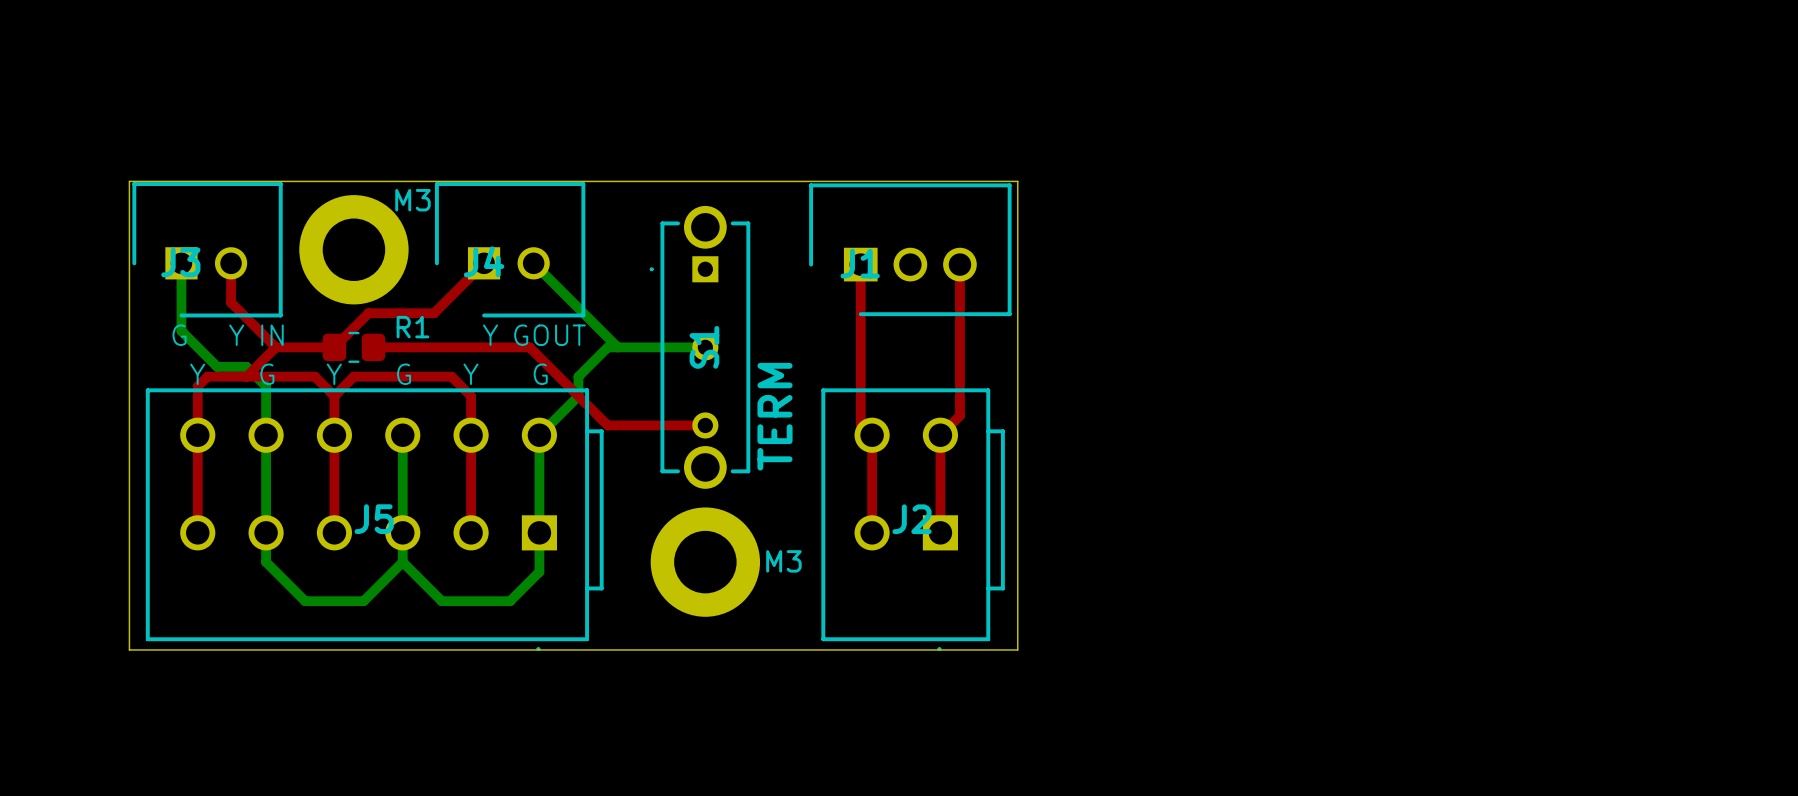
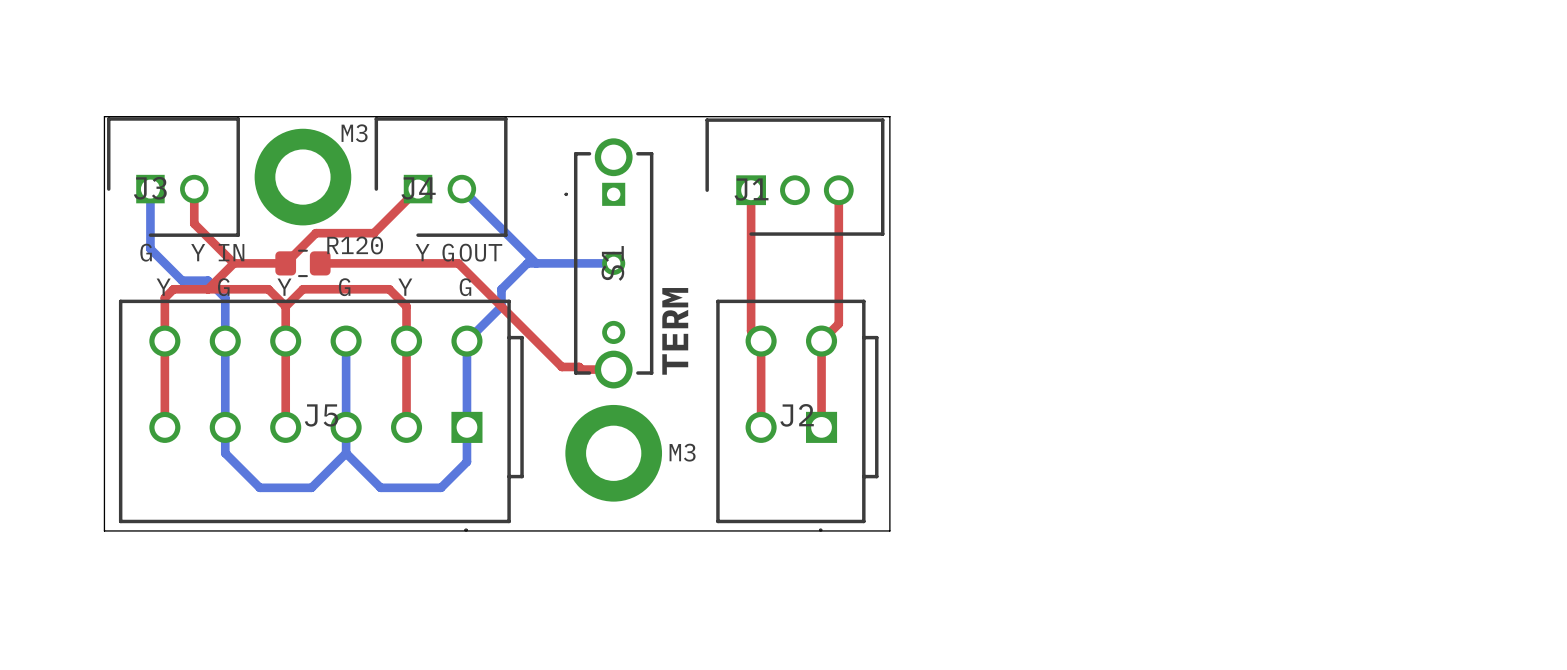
R1 name: R1 (412, 327) -> R120 (355, 245)
top track: (607, 425) (705, 425) -> (527, 332) (561, 366) (579, 366) (581, 369) (613, 369)

